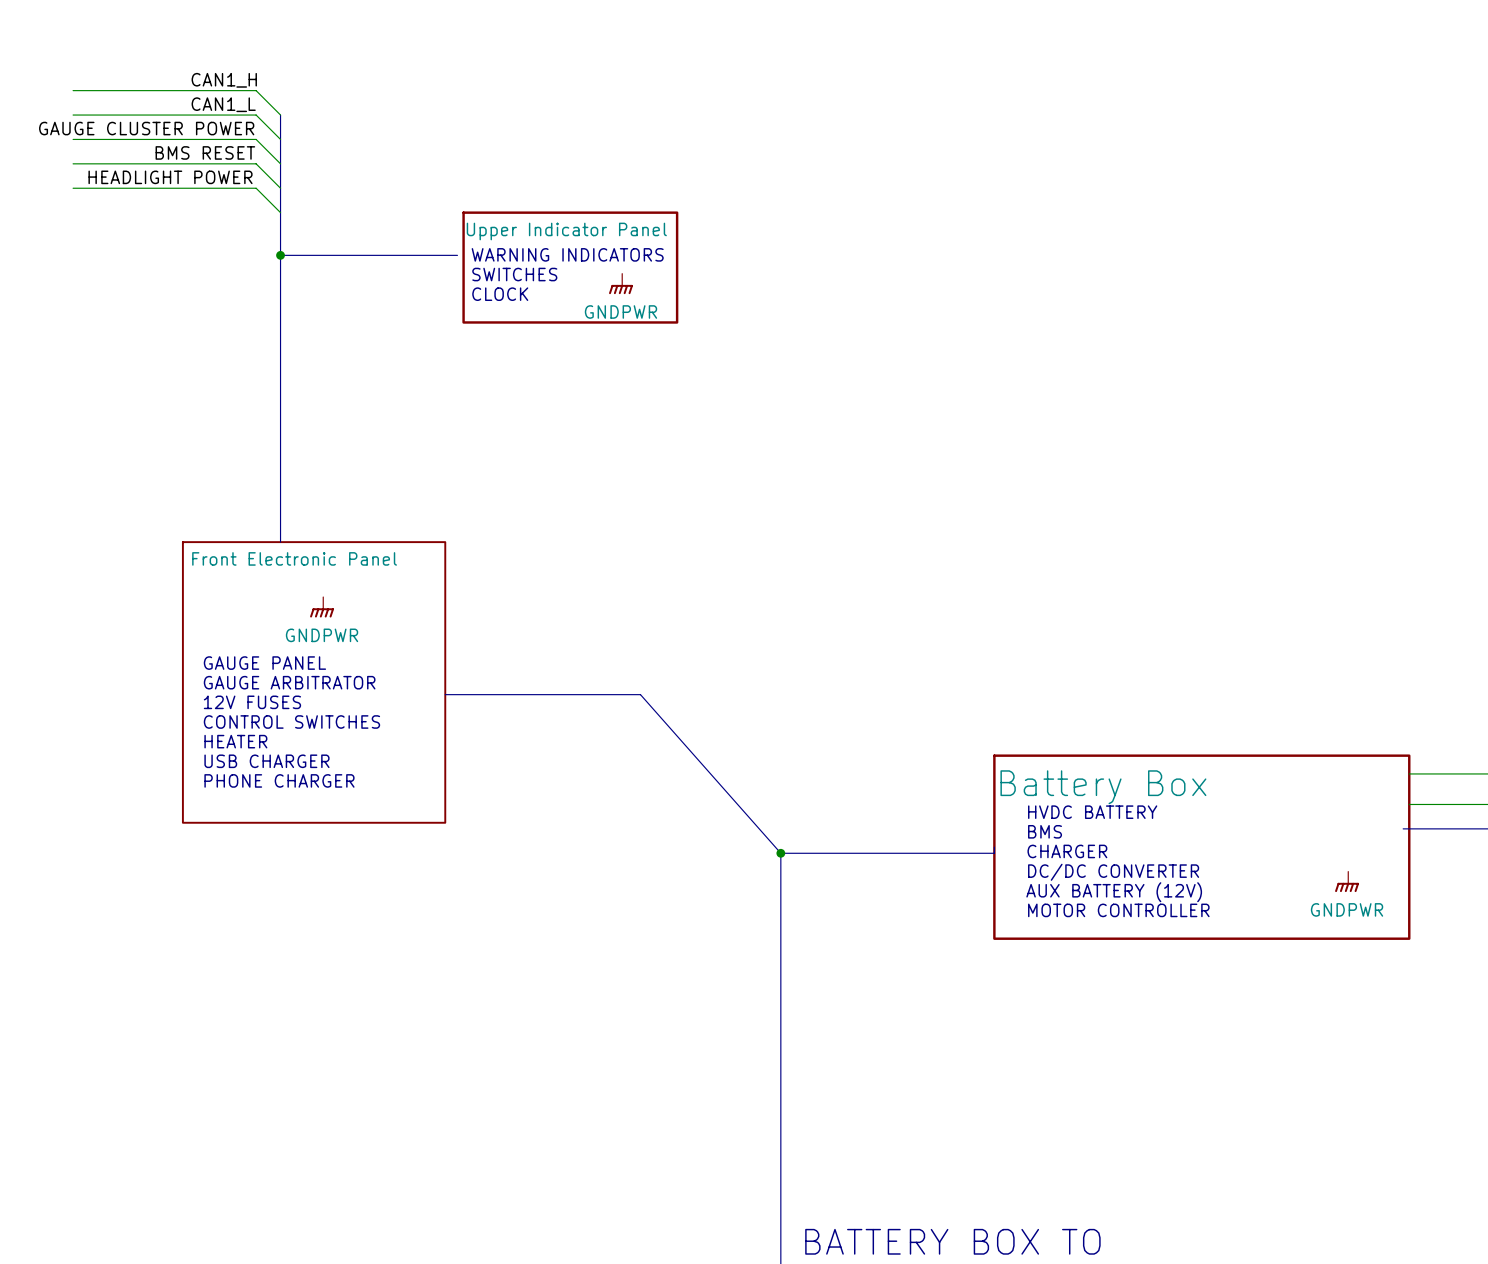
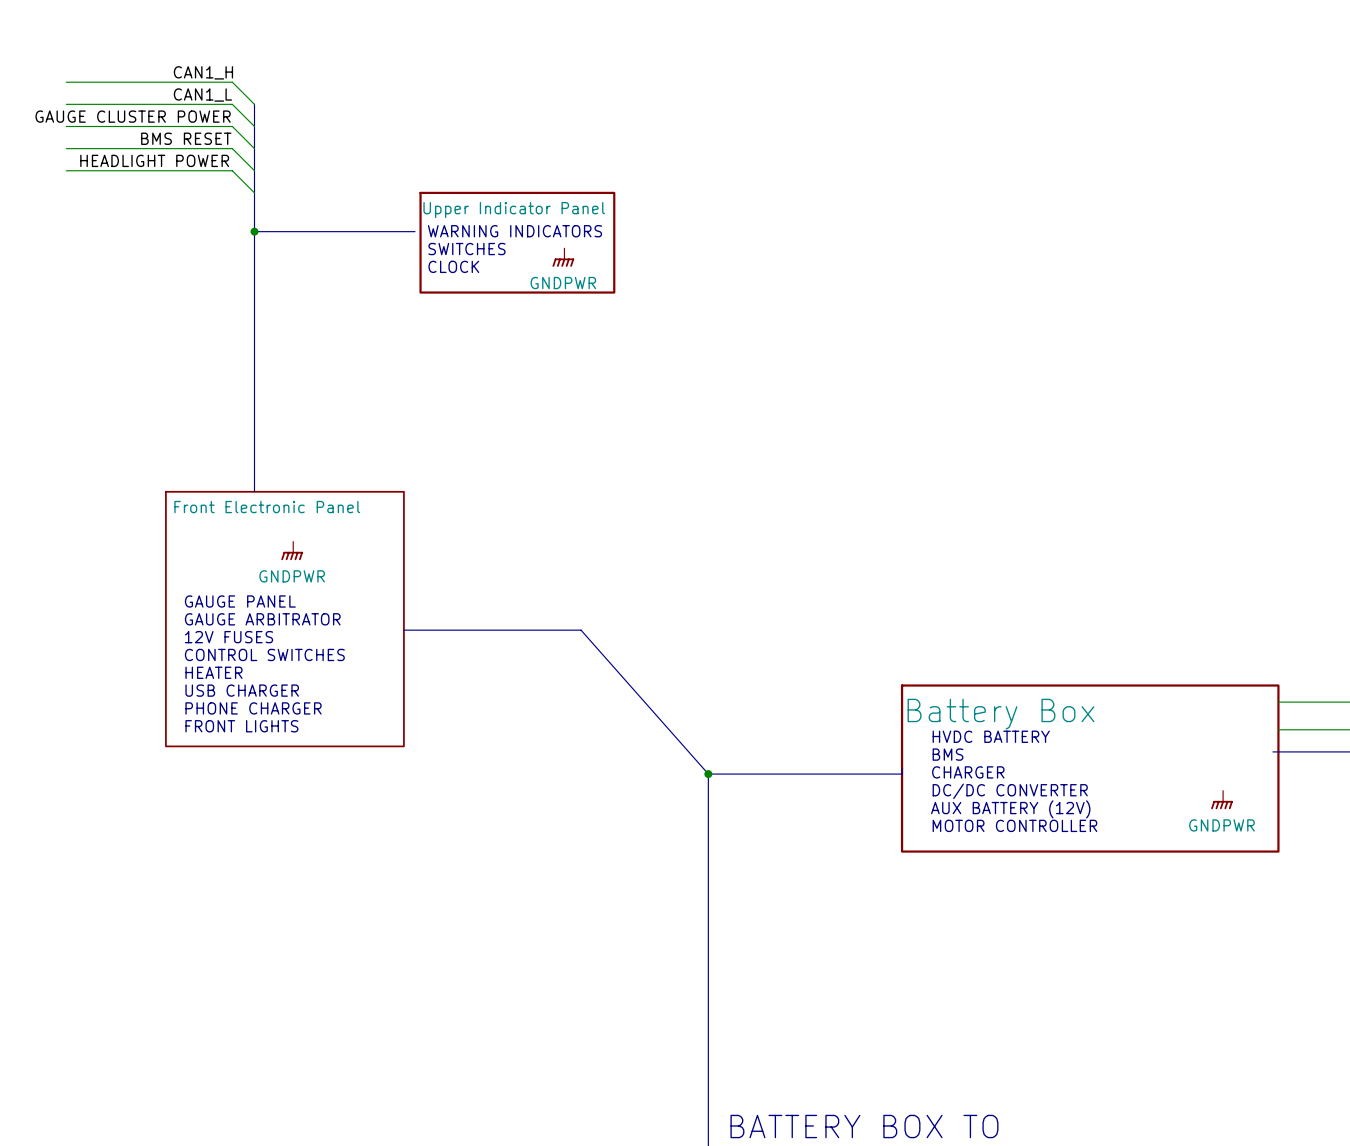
text: none -> FRONT LIGHTS (241, 726)

